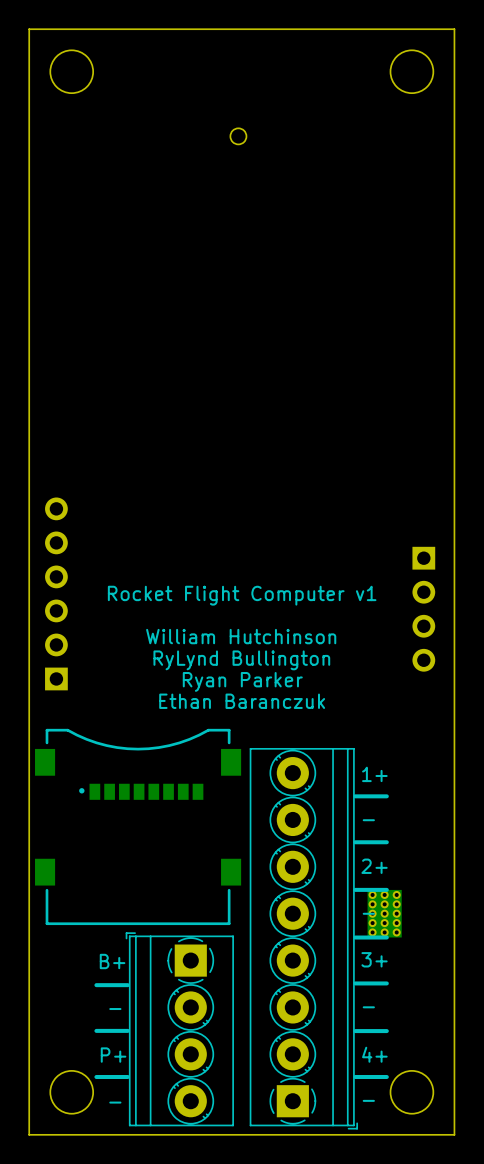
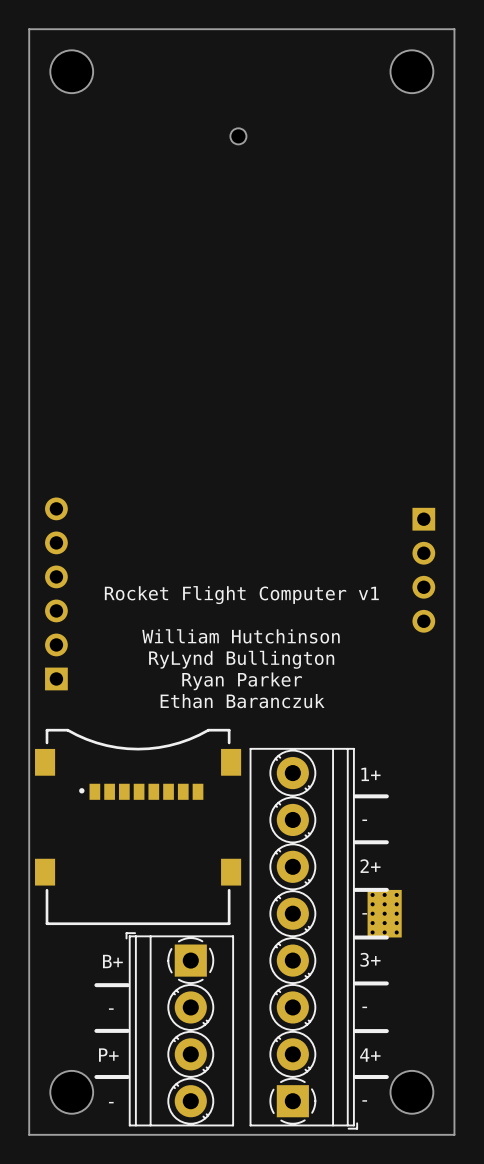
part position: (423, 609) -> (423, 570)

